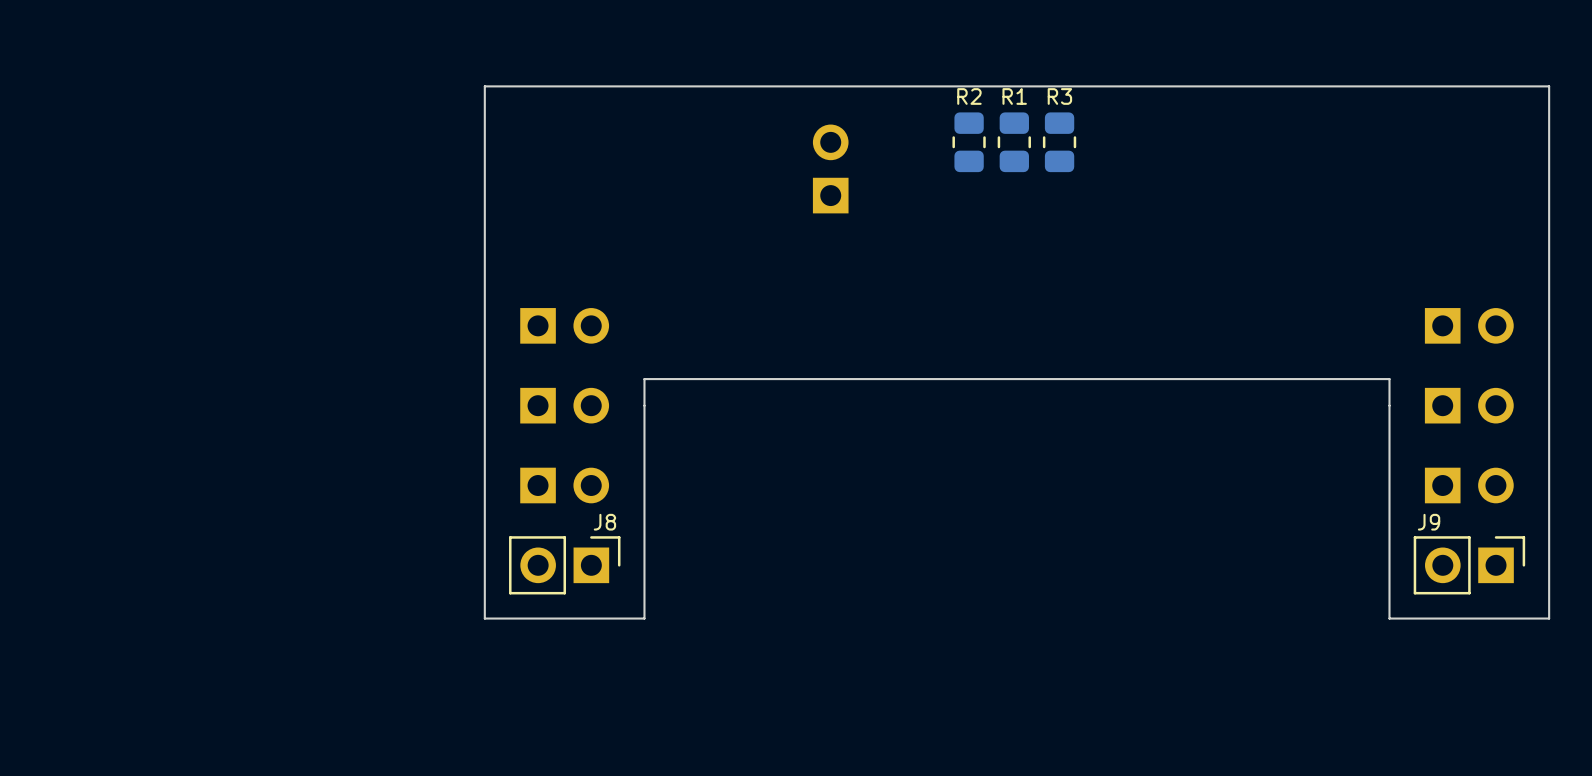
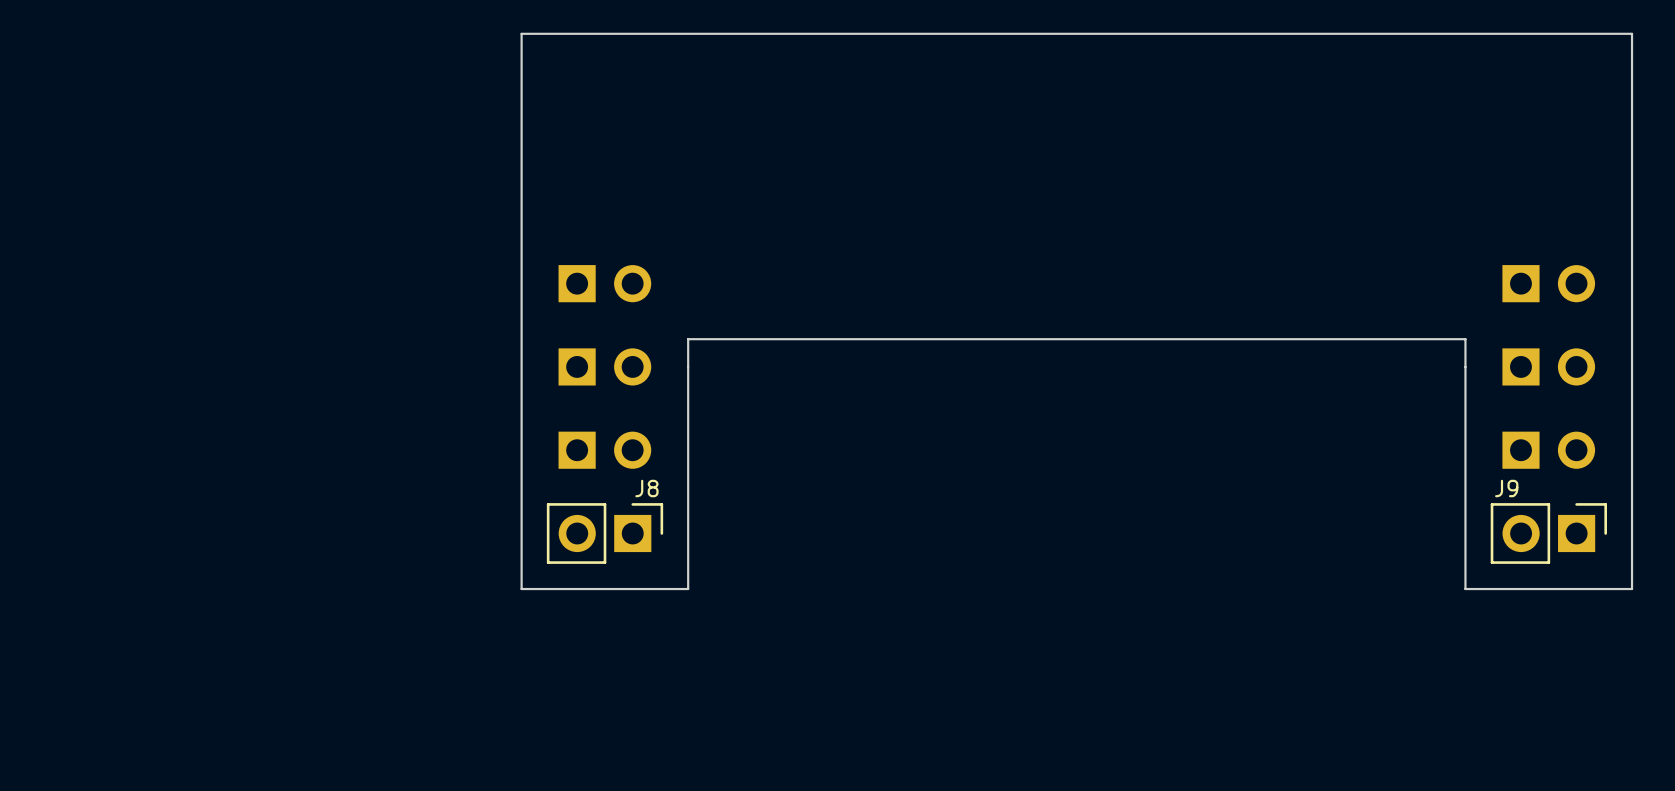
R2: (969, 142) -> none
R1: (1014, 142) -> none
R3: (1059, 142) -> none
part: (830, 168) -> none

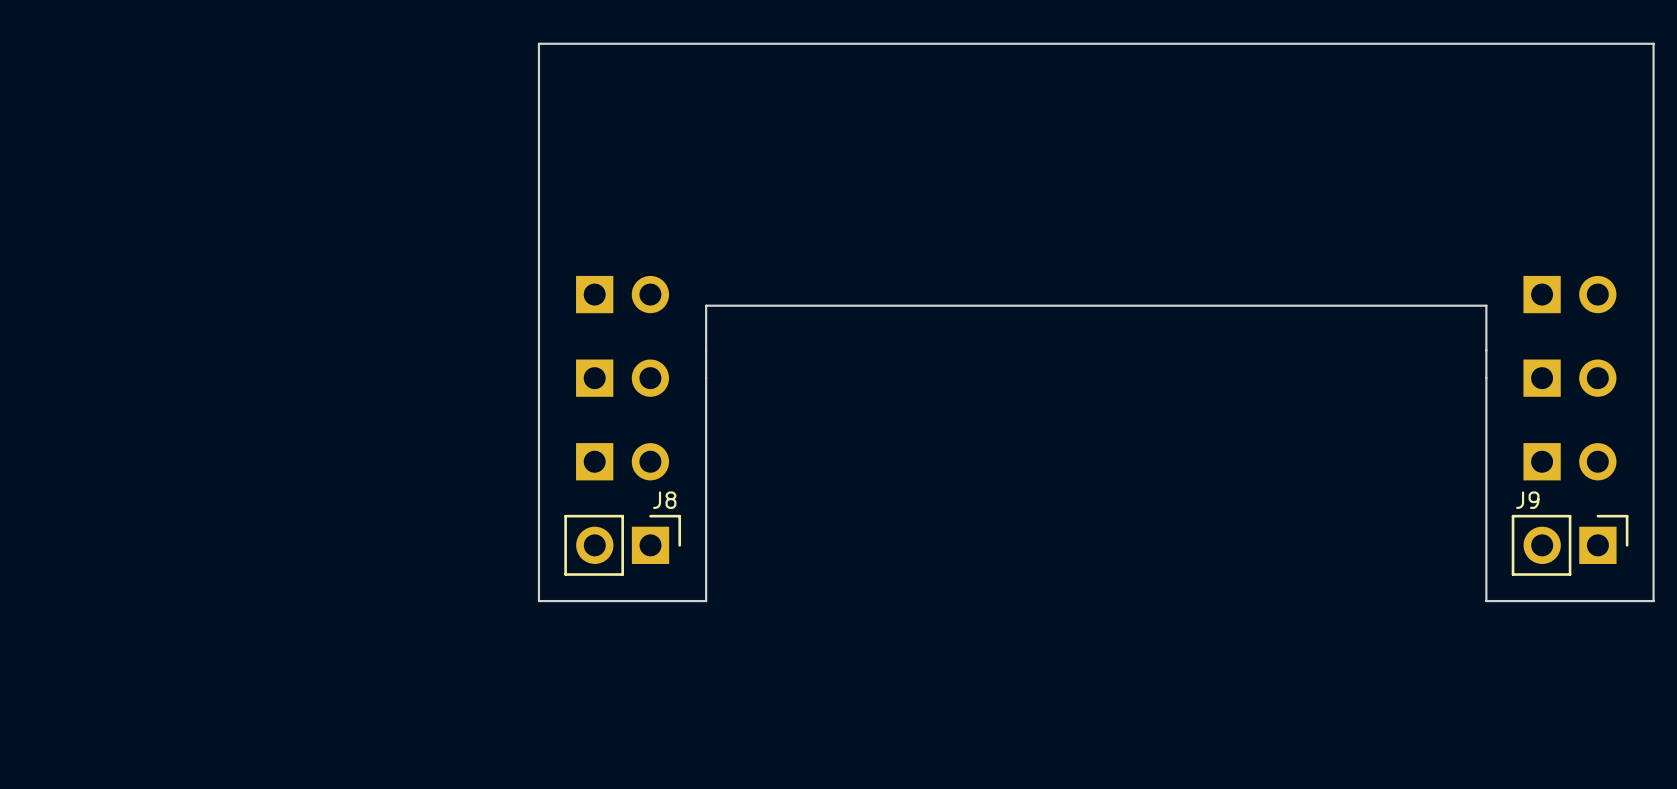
board edge: (1465, 339) (688, 339) -> (1486, 350) (1486, 305) (706, 305) (706, 350)

